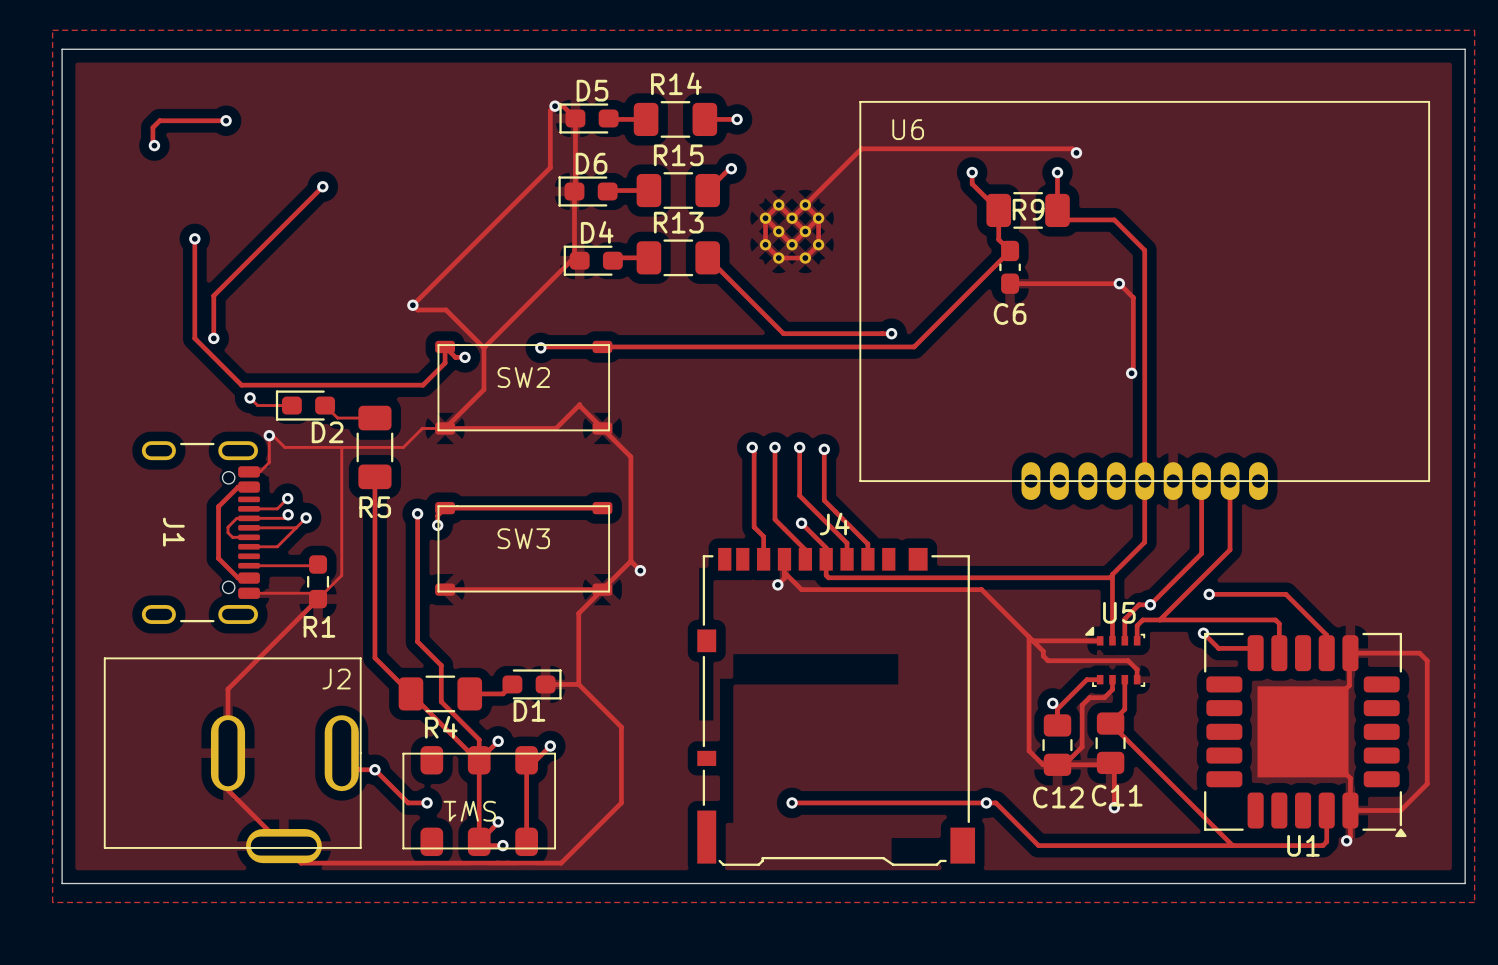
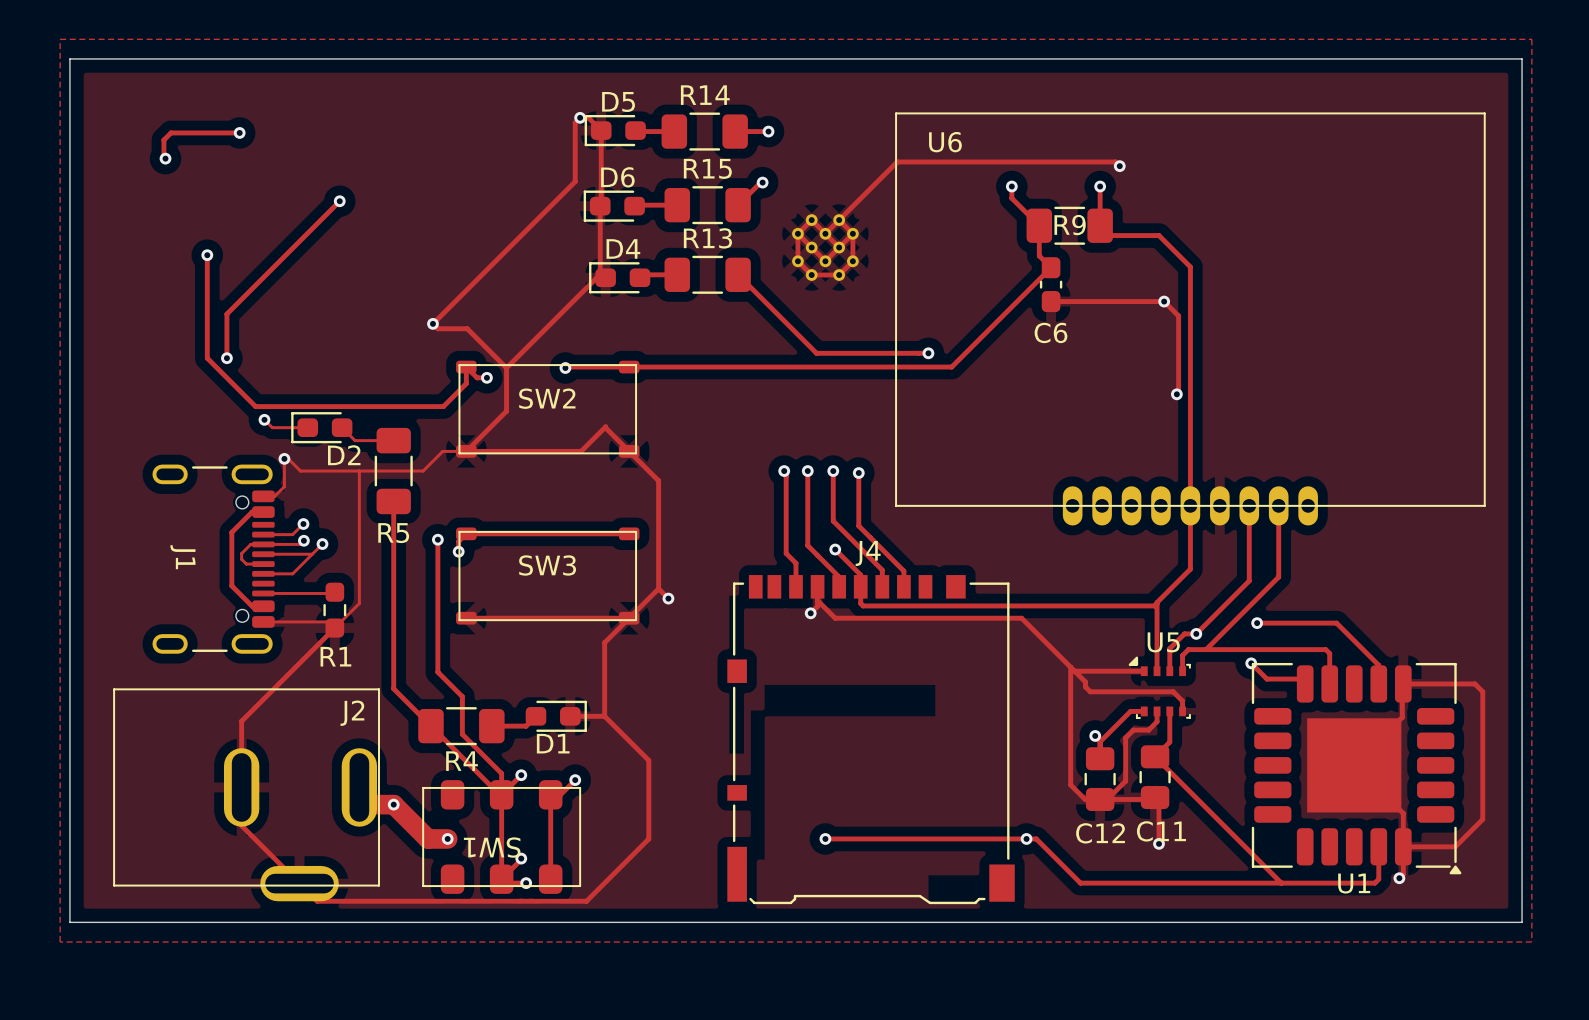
track width: thin (358, 769) (374, 769) (408, 802) (427, 802) -> thick (376, 804) (393, 804) (428, 838) (447, 838)

